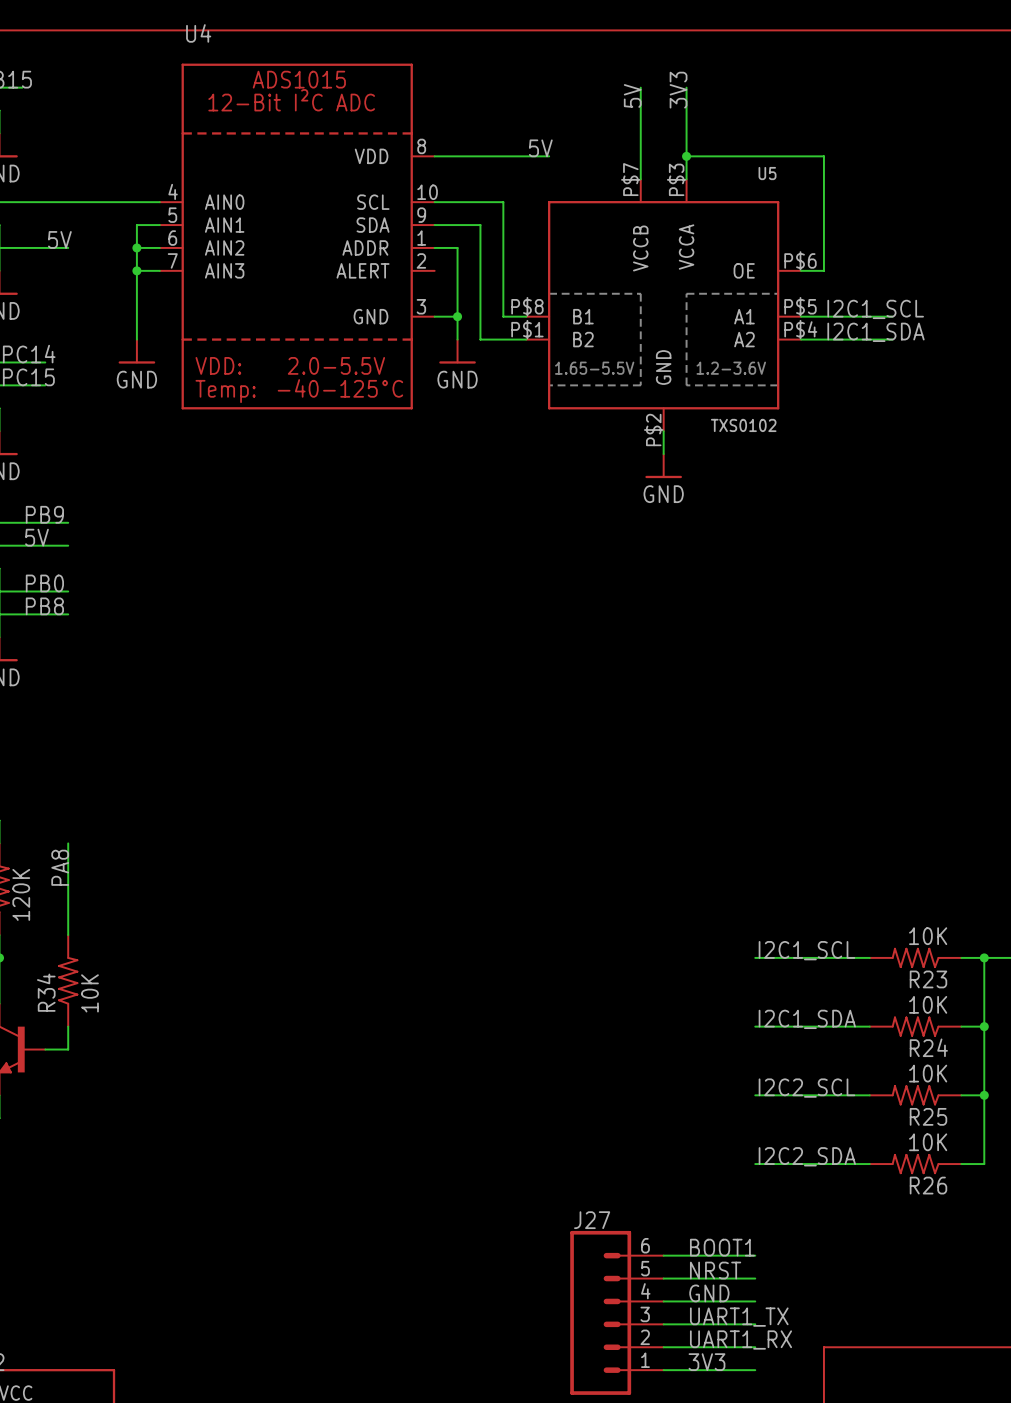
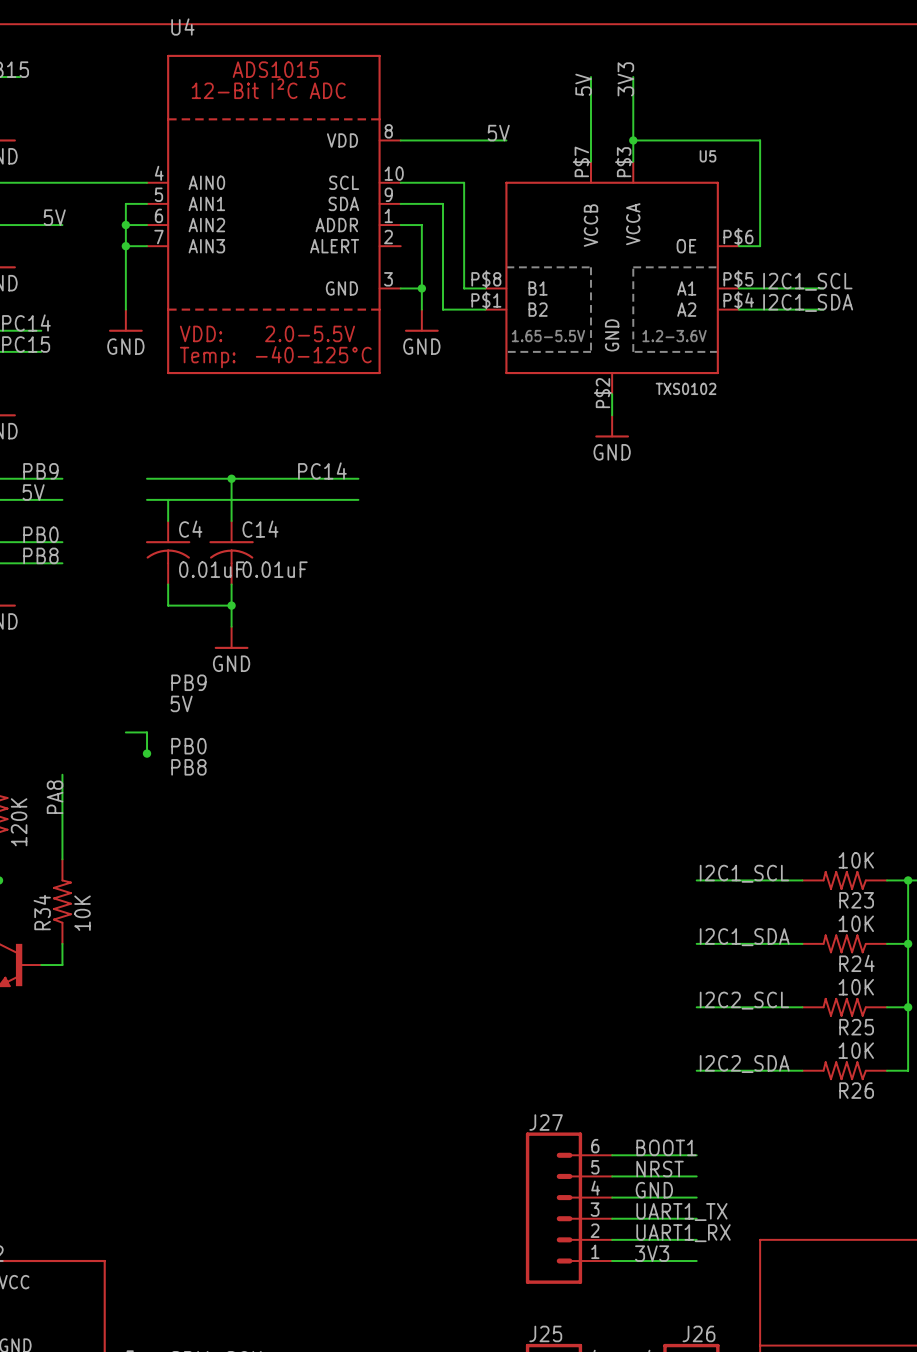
label: none -> PC14 (322, 470)
wire: none -> (147, 478) (358, 478)
wire: none -> (231, 478) (231, 521)
junction: none -> (231, 478)
wire: none -> (147, 499) (358, 499)
wire: none -> (168, 499) (168, 521)
C4: none -> 0.01uF (168, 552)
C14: none -> 0.01uF (231, 552)
wire: none -> (168, 584) (168, 605) (231, 605)
wire: none -> (231, 584) (231, 626)
junction: none -> (231, 605)
power symbol: none -> GND (231, 637)
label: none -> PB9 (188, 682)
label: none -> 5V (181, 703)
wire: none -> (125, 732) (147, 732) (147, 753)
label: none -> PB0 (188, 746)
junction: none -> (147, 753)
label: none -> PB8 (188, 767)

